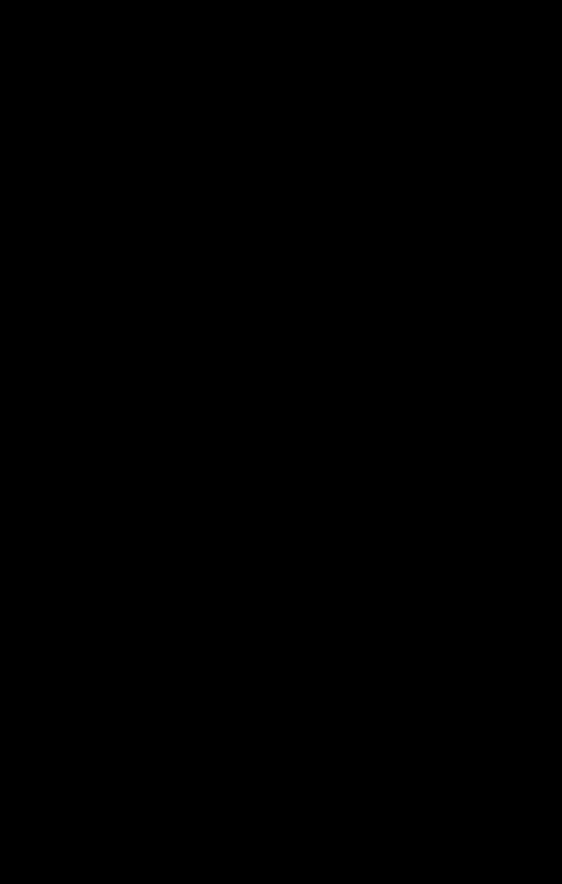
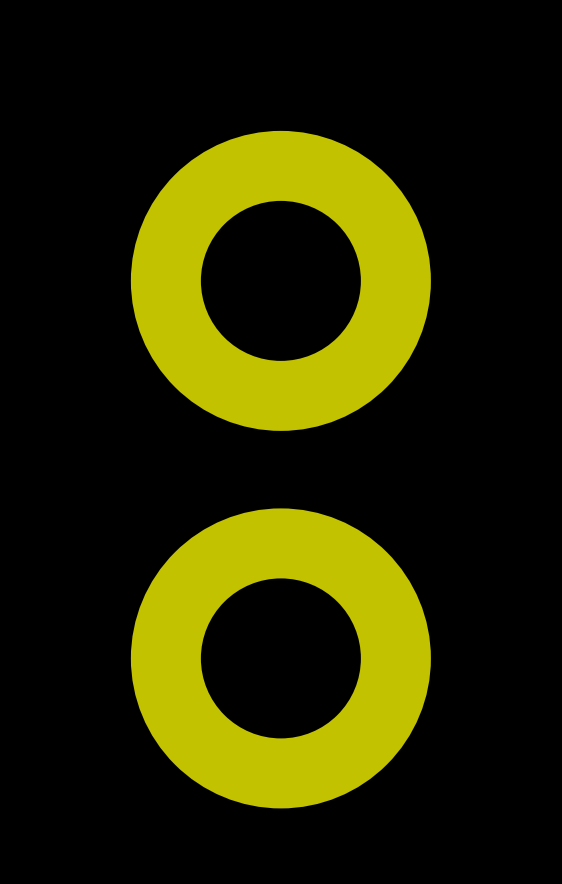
part: none -> (280, 280)
part: none -> (280, 658)

